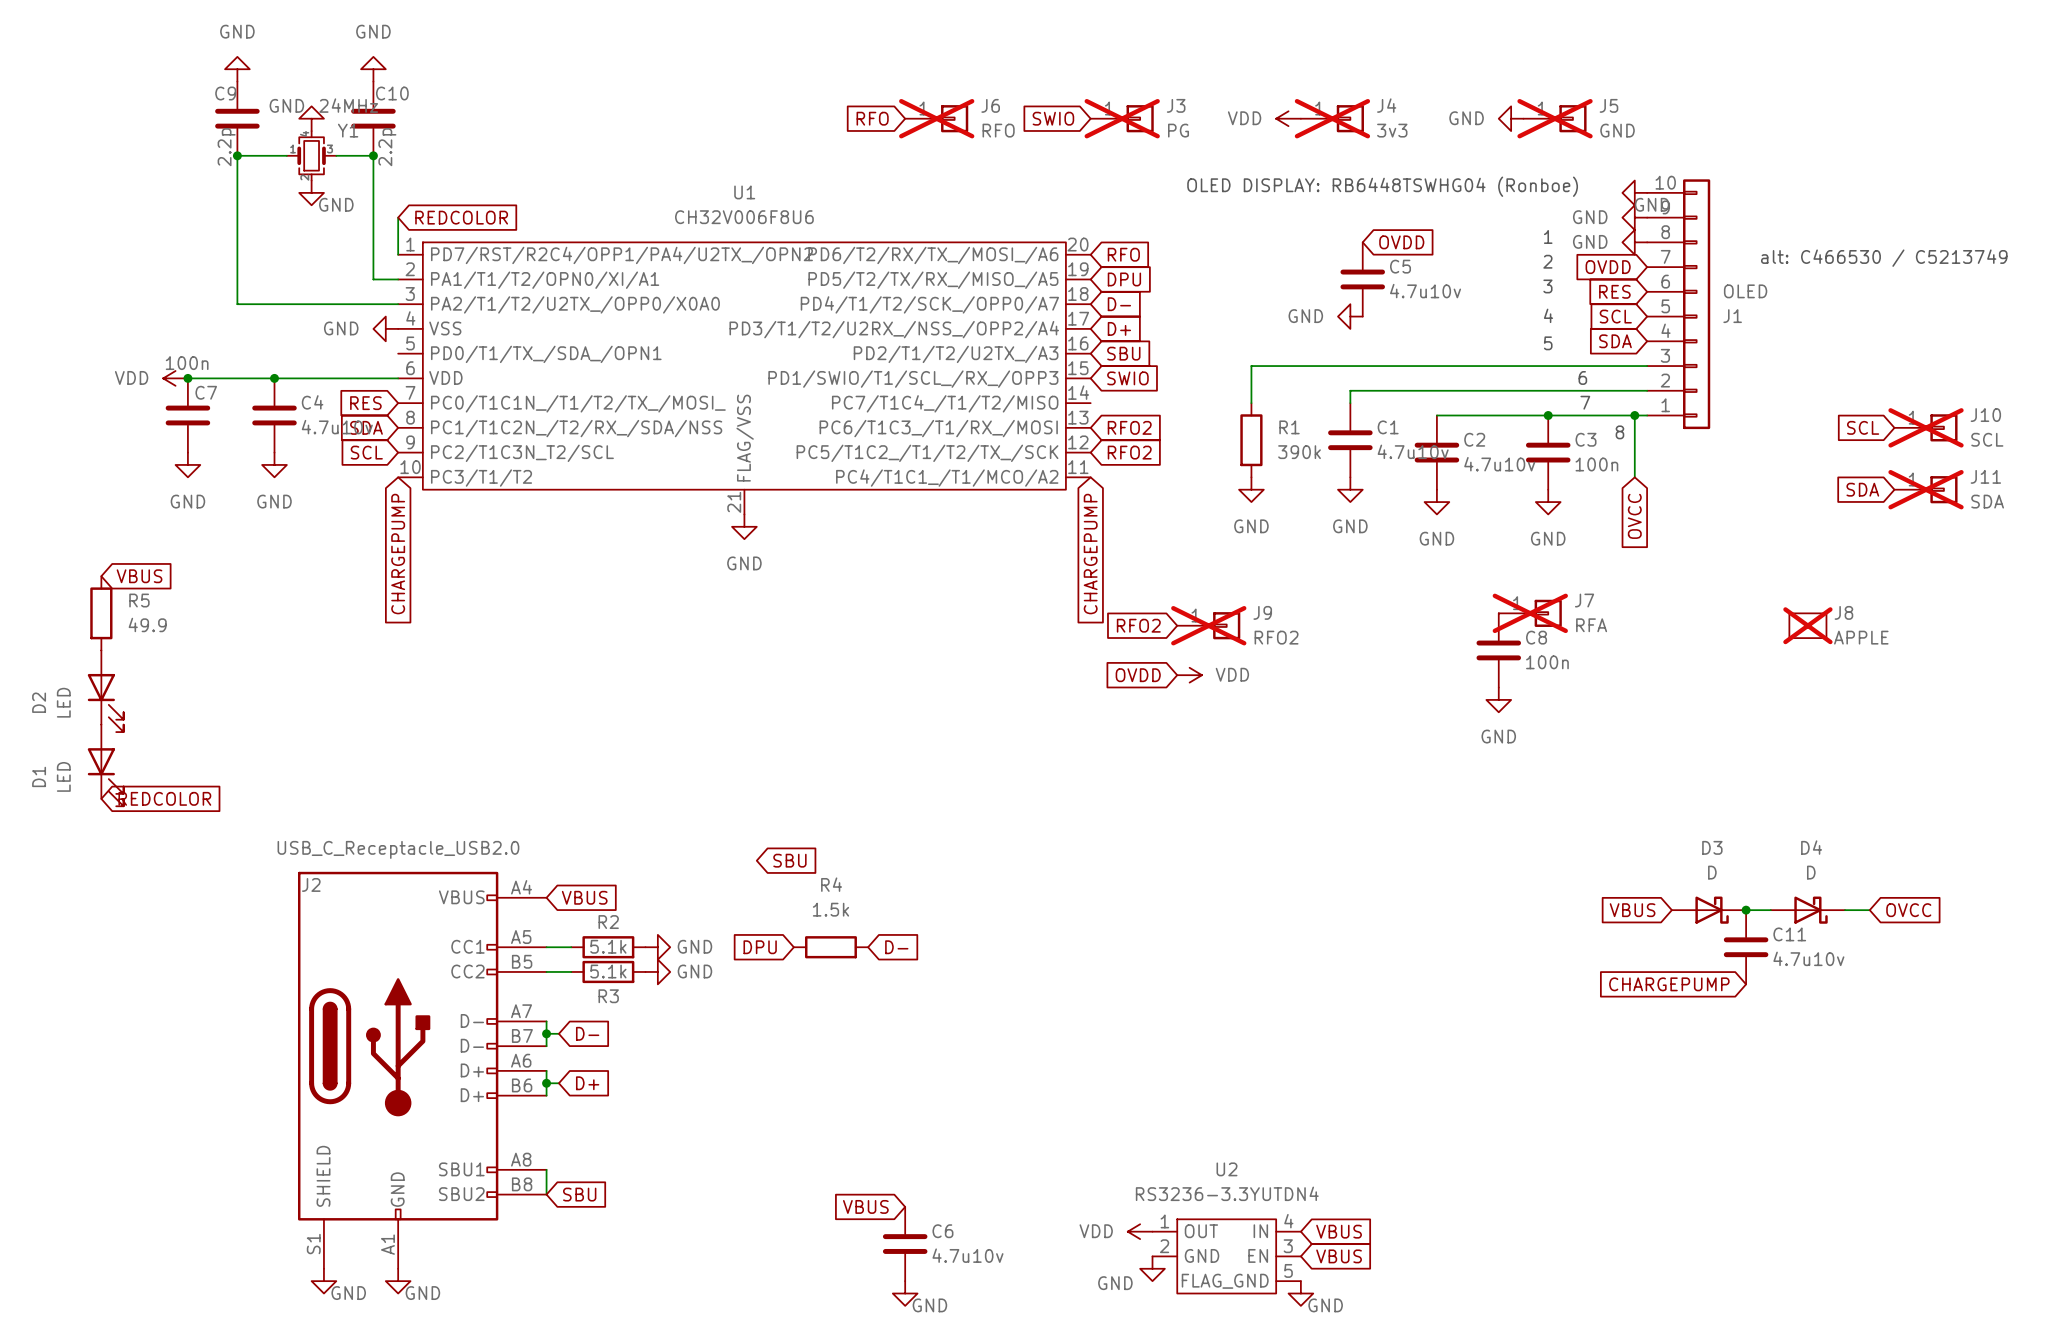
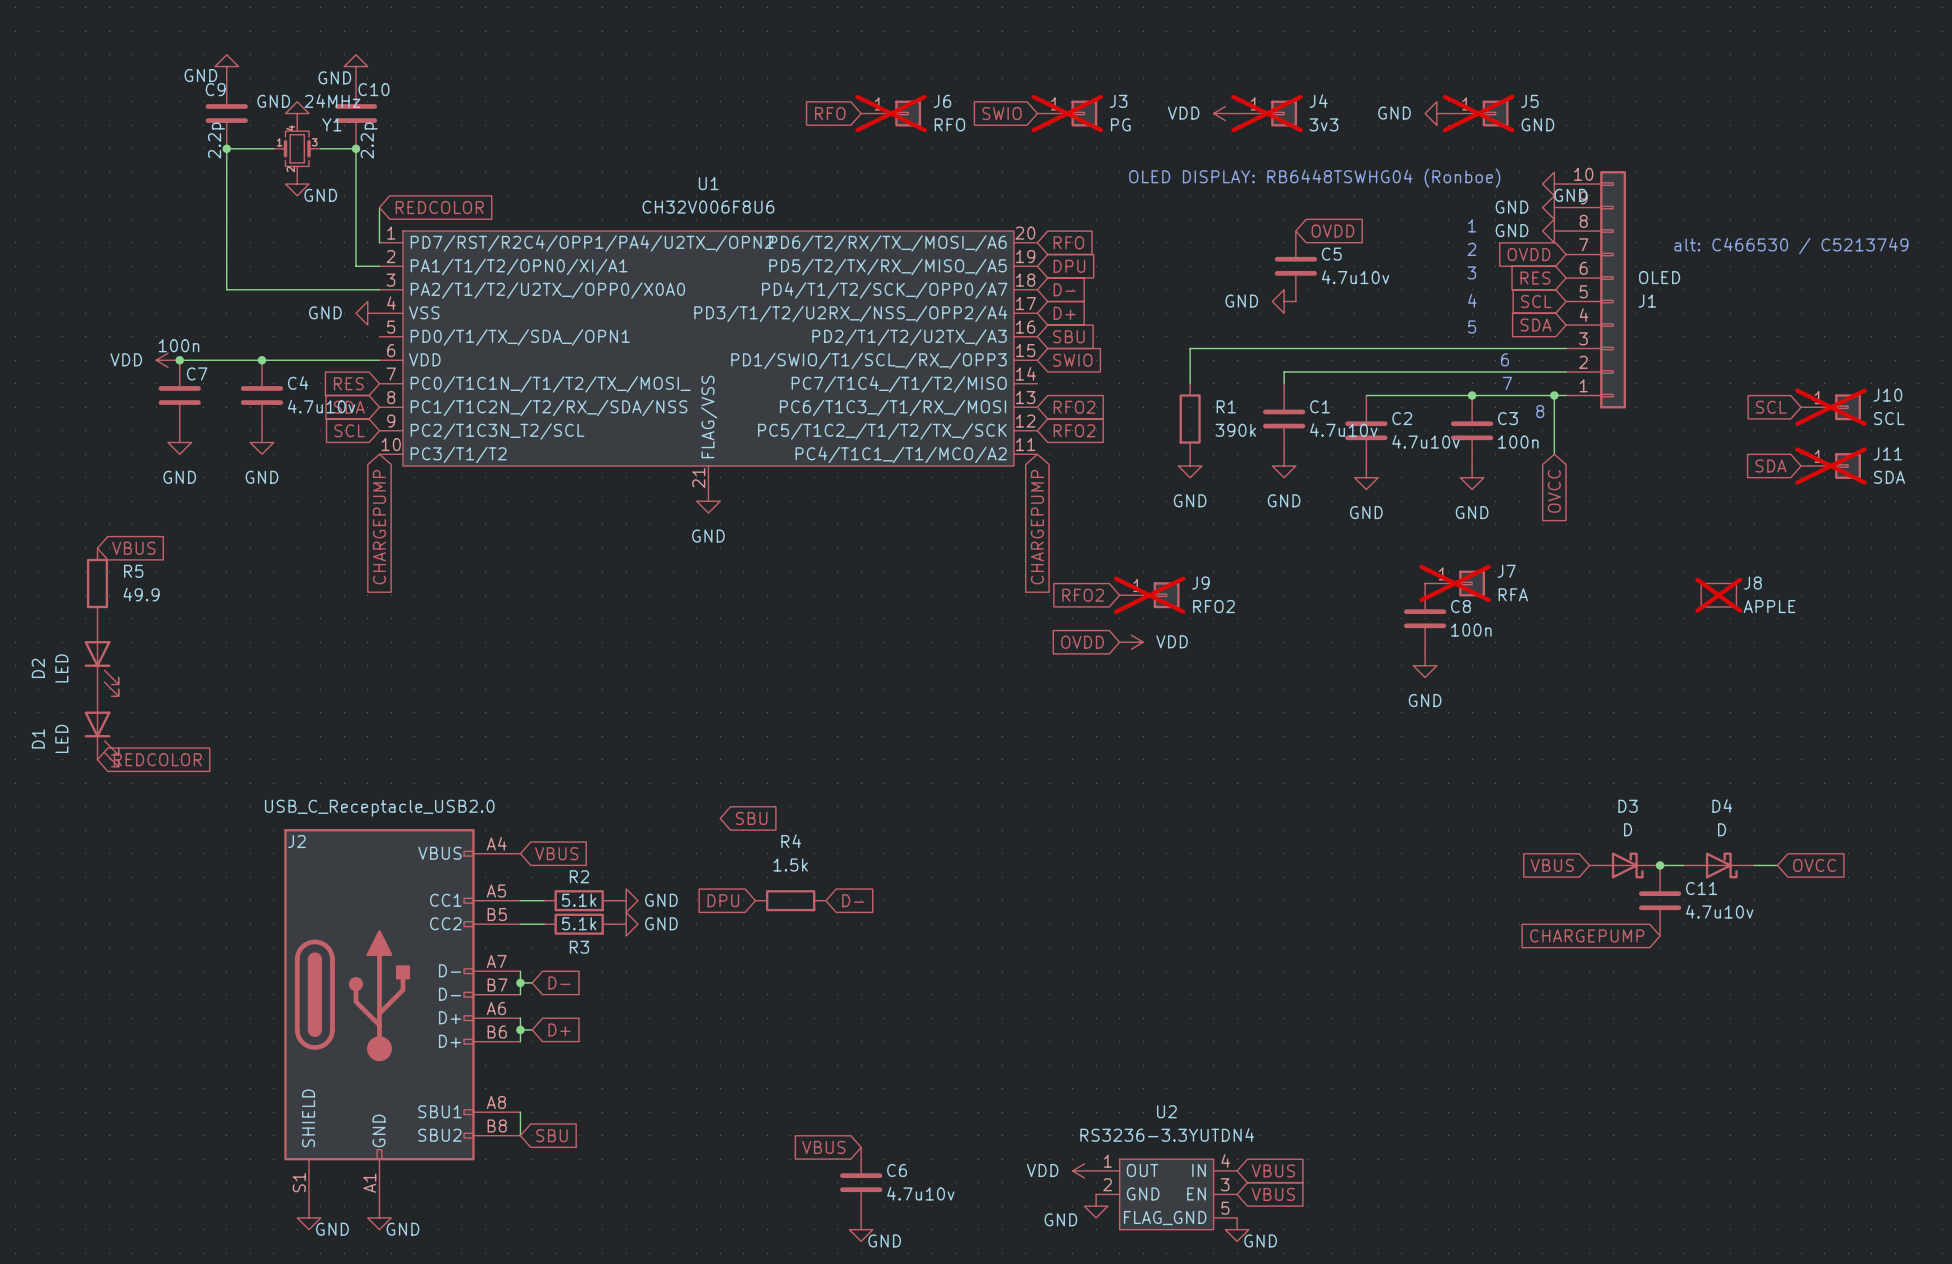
power symbol text position: GND (237, 31) -> GND (200, 75)
power symbol text position: GND (373, 31) -> GND (334, 77)

